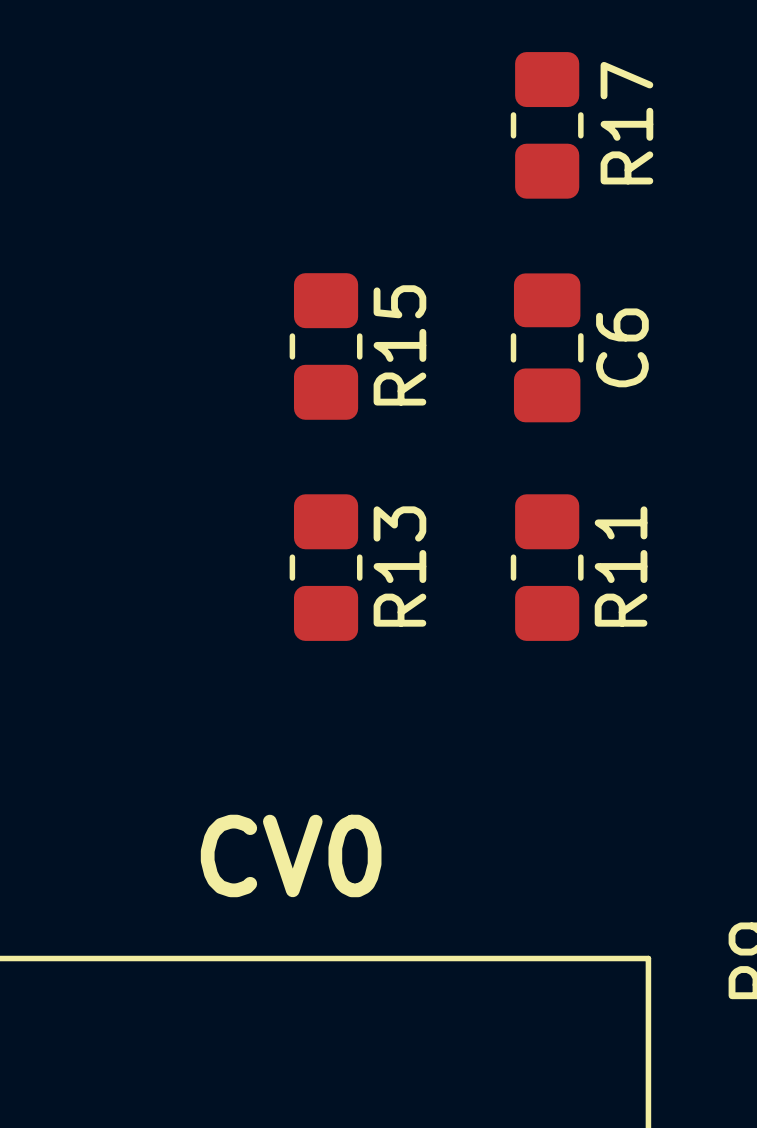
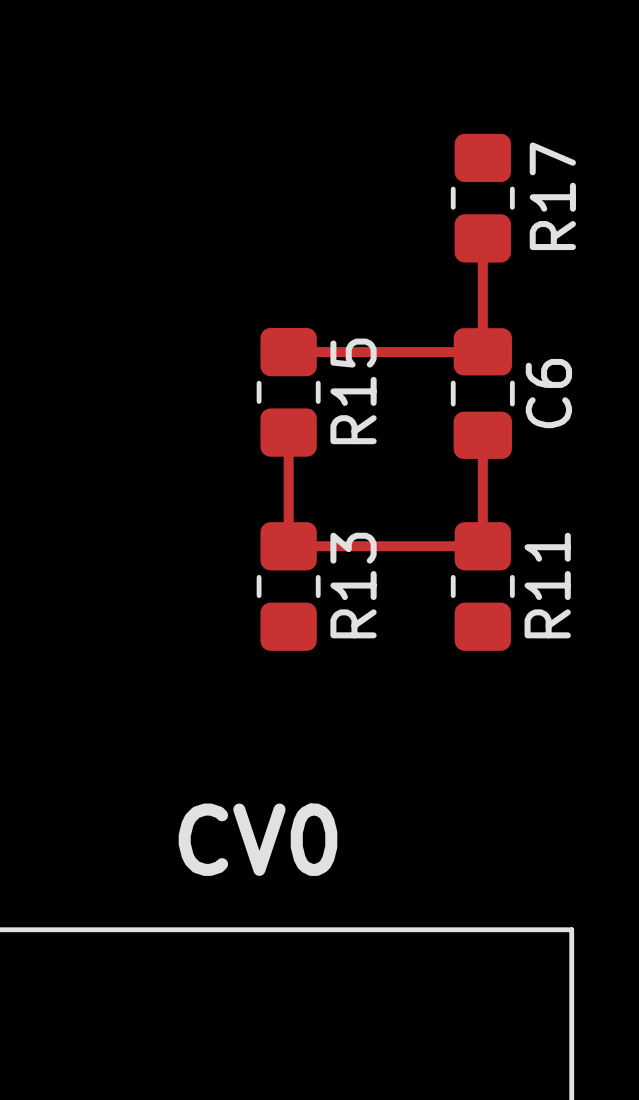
track: none -> (482, 238) (482, 351)
track: none -> (288, 352) (482, 352)
track: none -> (288, 432) (288, 546) (482, 546) (482, 435)

